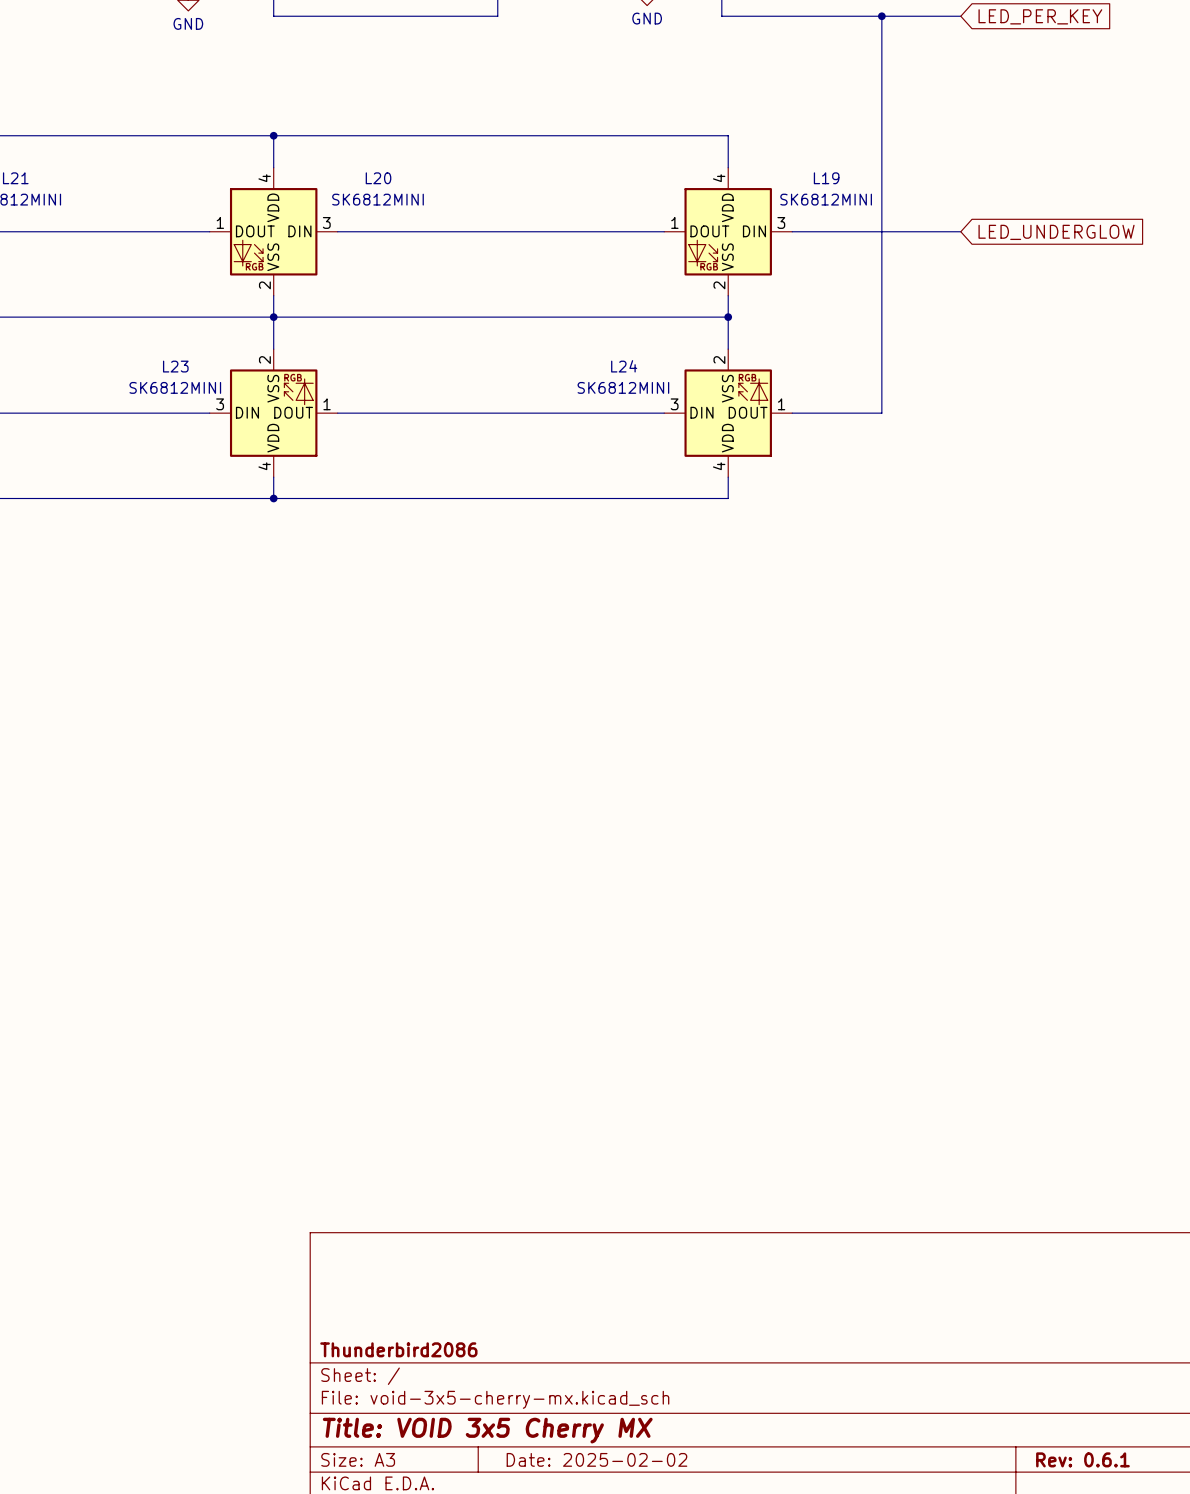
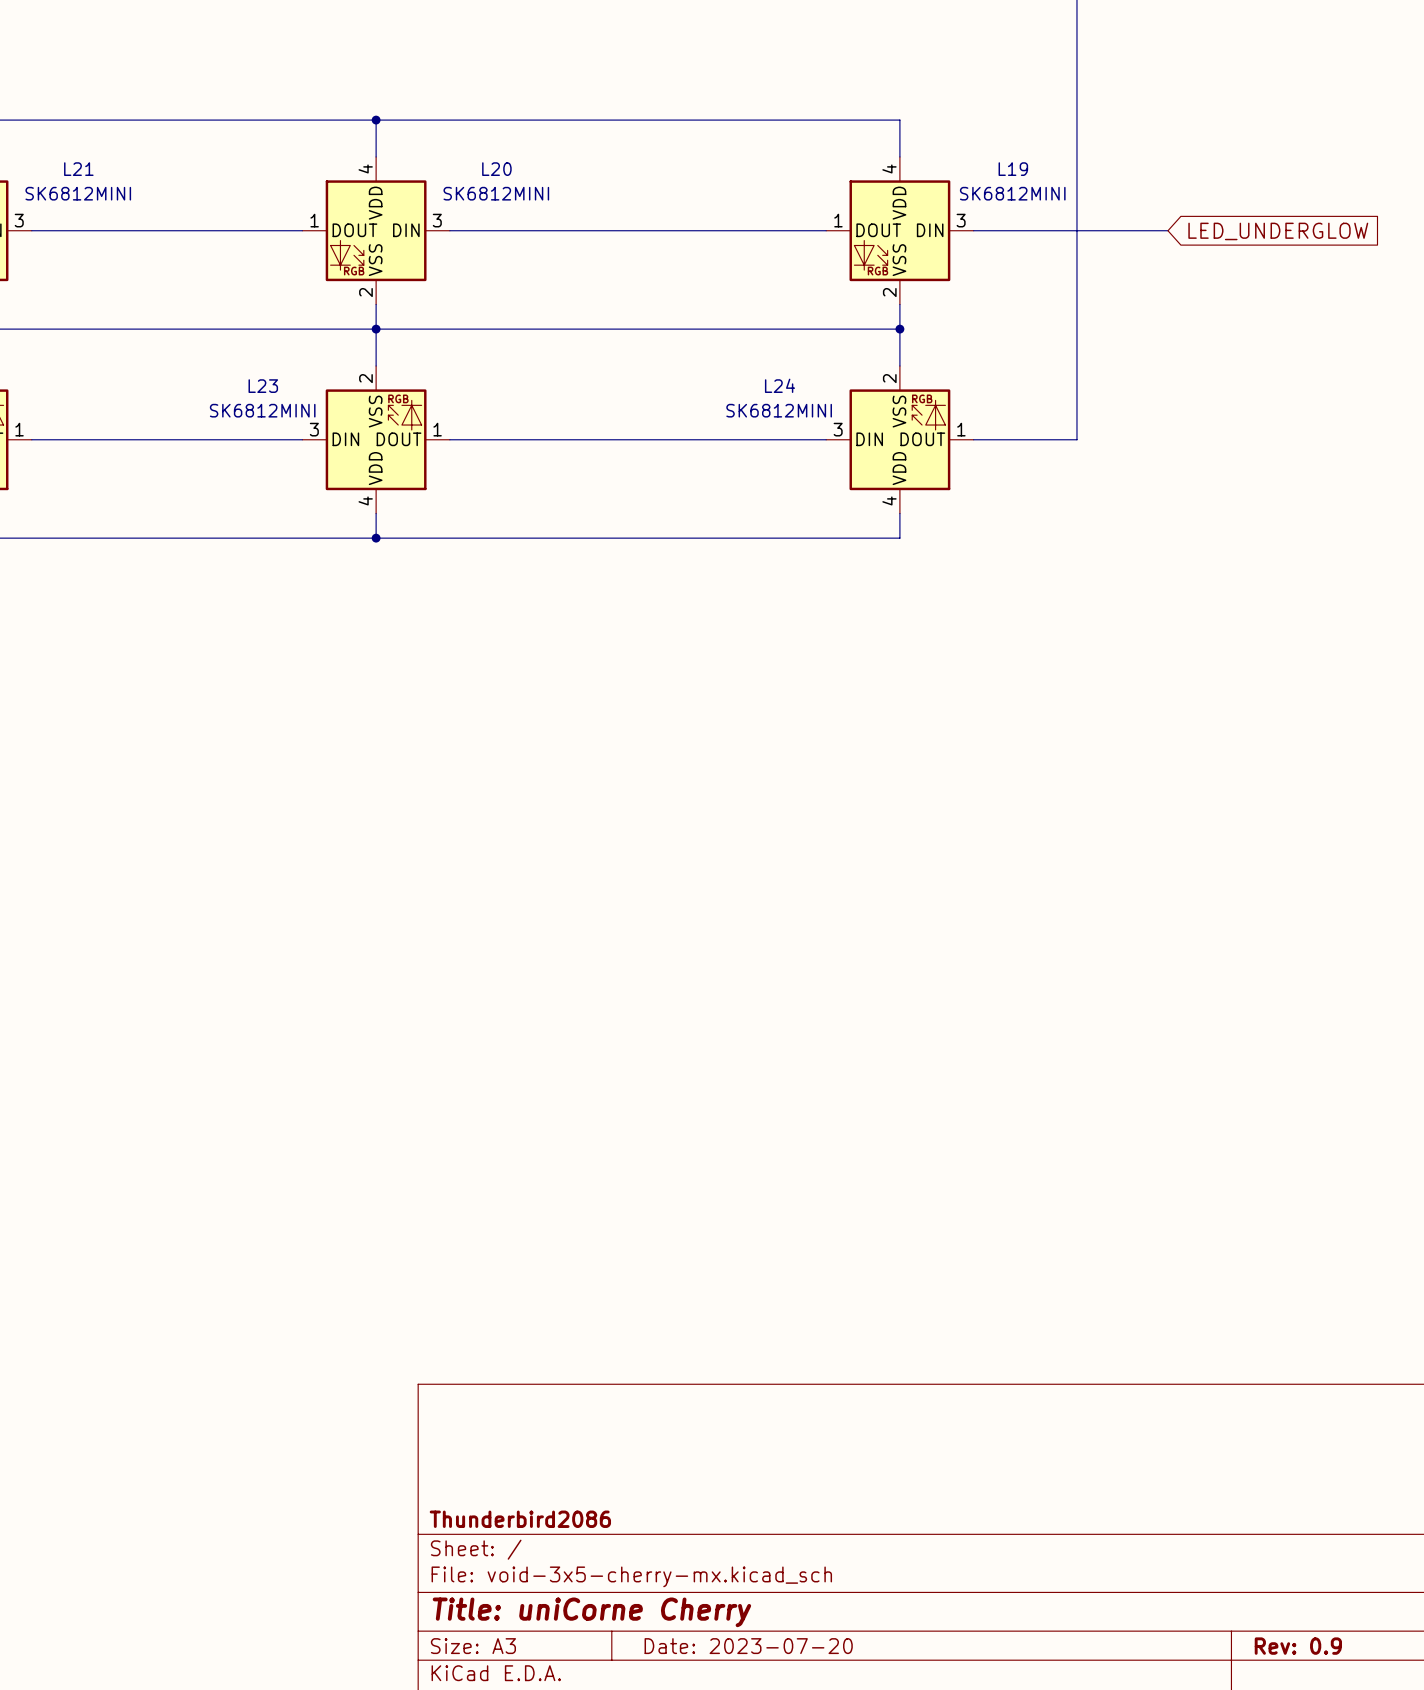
title block: Title: VOID 3x5 Cherry MX (487, 1430) -> Title: uniCorne Cherry (591, 1612)
title block: Date: 2025-02-02 (596, 1459) -> Date: 2023-07-20 (748, 1646)
title block: Rev: 0.6.1 (1082, 1459) -> Rev: 0.9 (1298, 1646)

